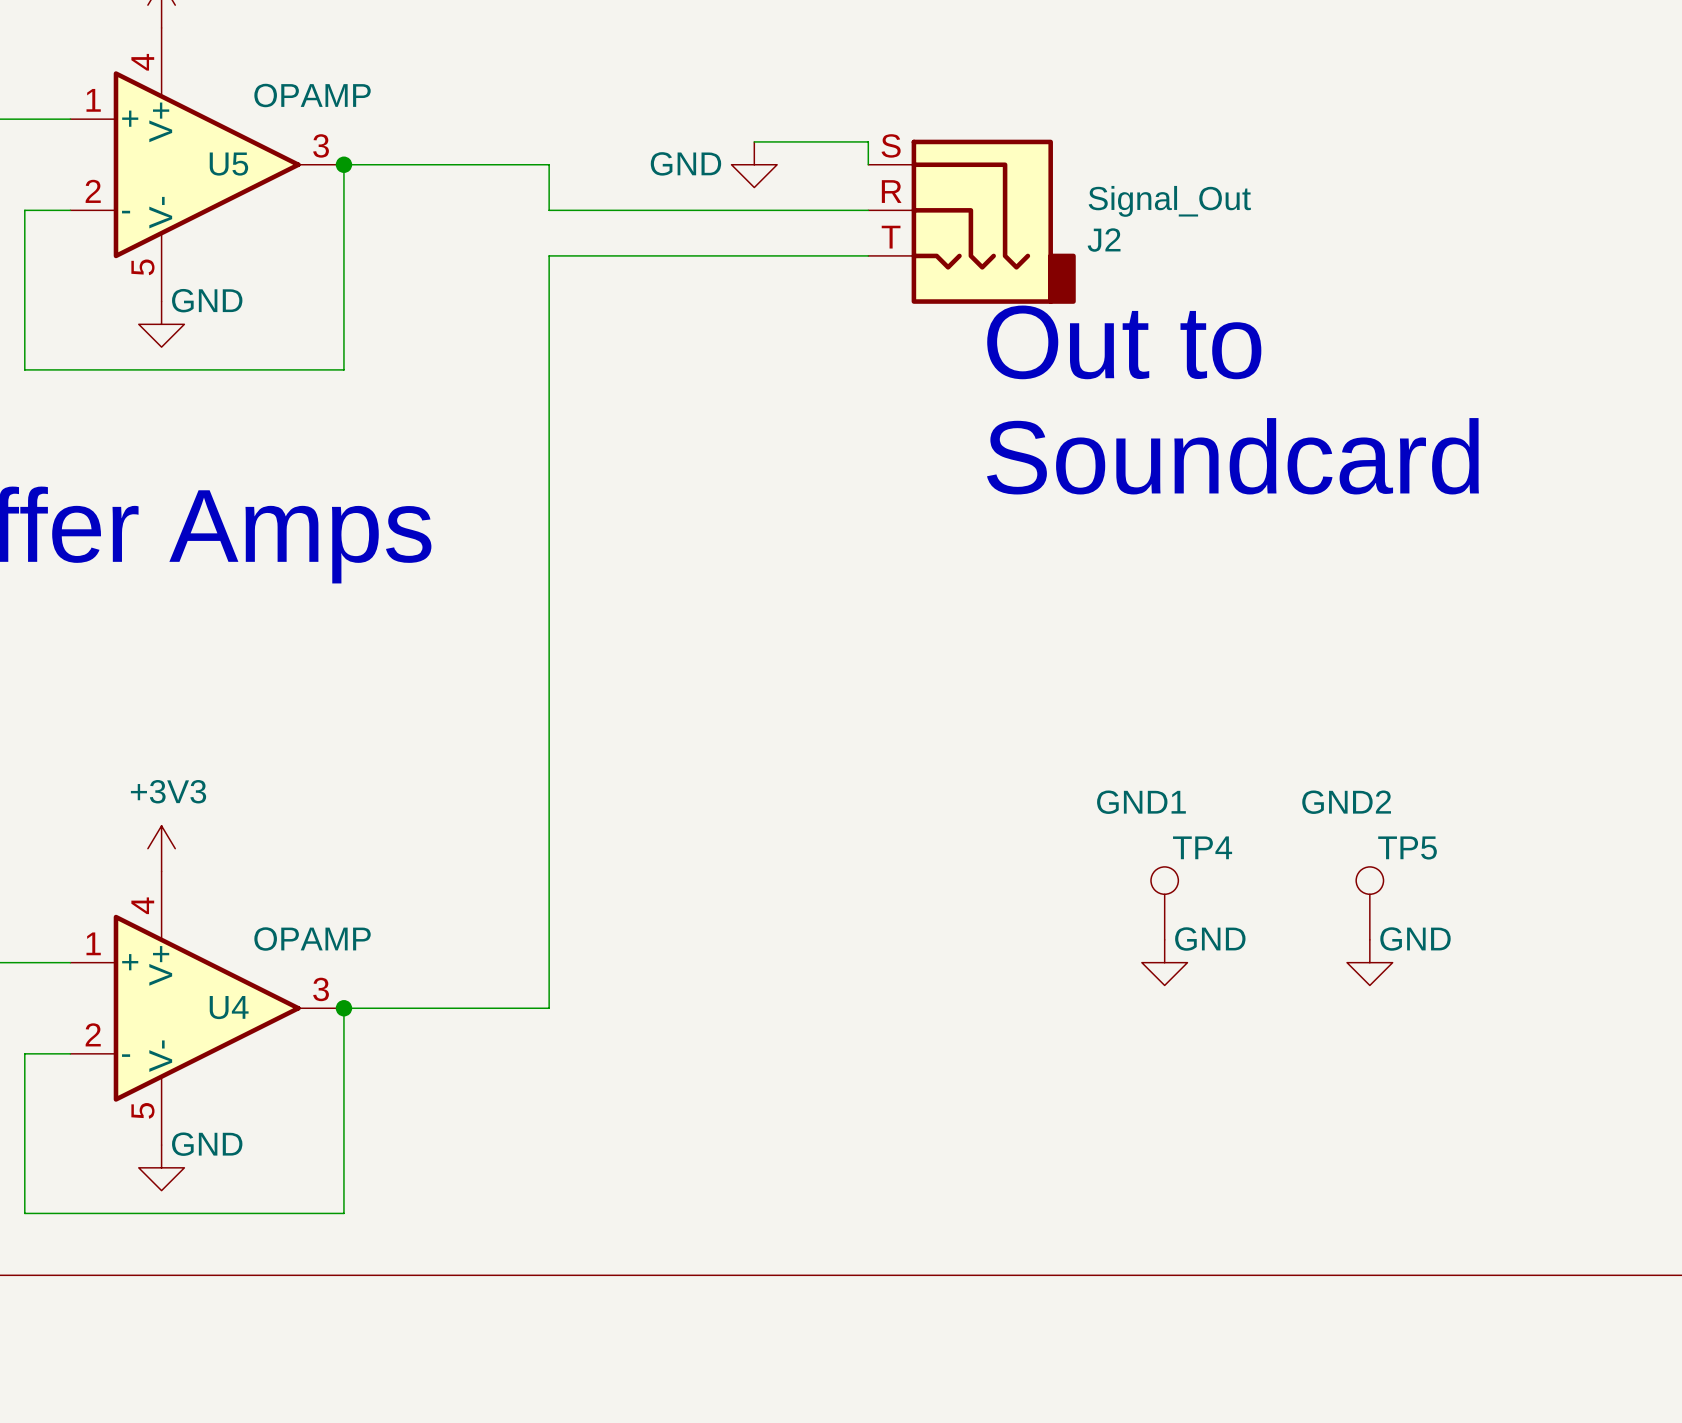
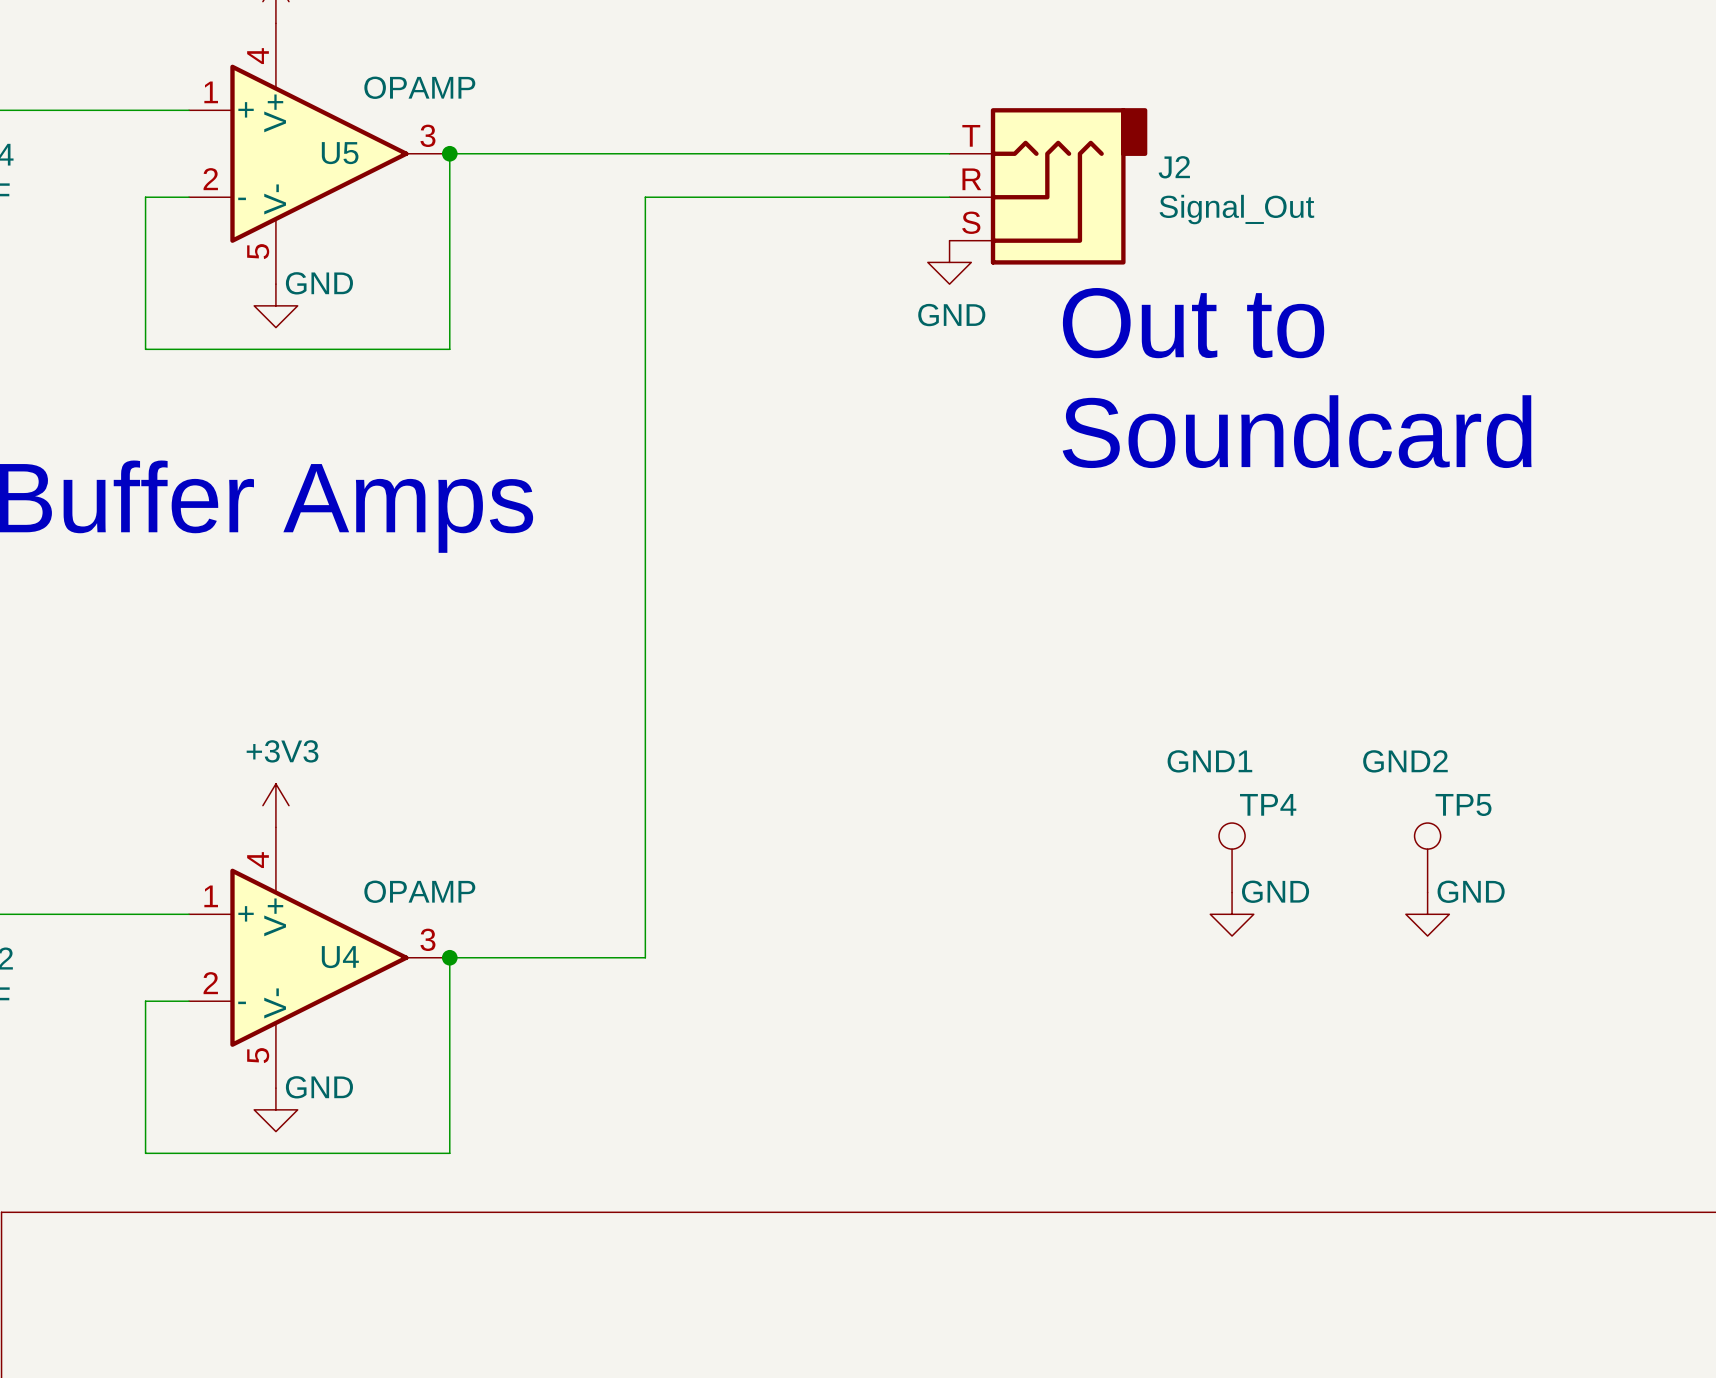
wire: (754, 141) (868, 141) (868, 164) -> (645, 153) (949, 153)
power symbol text position: GND (685, 163) -> GND (951, 315)
wire: (549, 164) (549, 210) -> (645, 240) (645, 197)
power symbol position: GND (754, 164) -> GND (949, 262)
J2 flip: as is (993, 221) -> up-down (1069, 186)
wire: (549, 255) (868, 255) -> none

